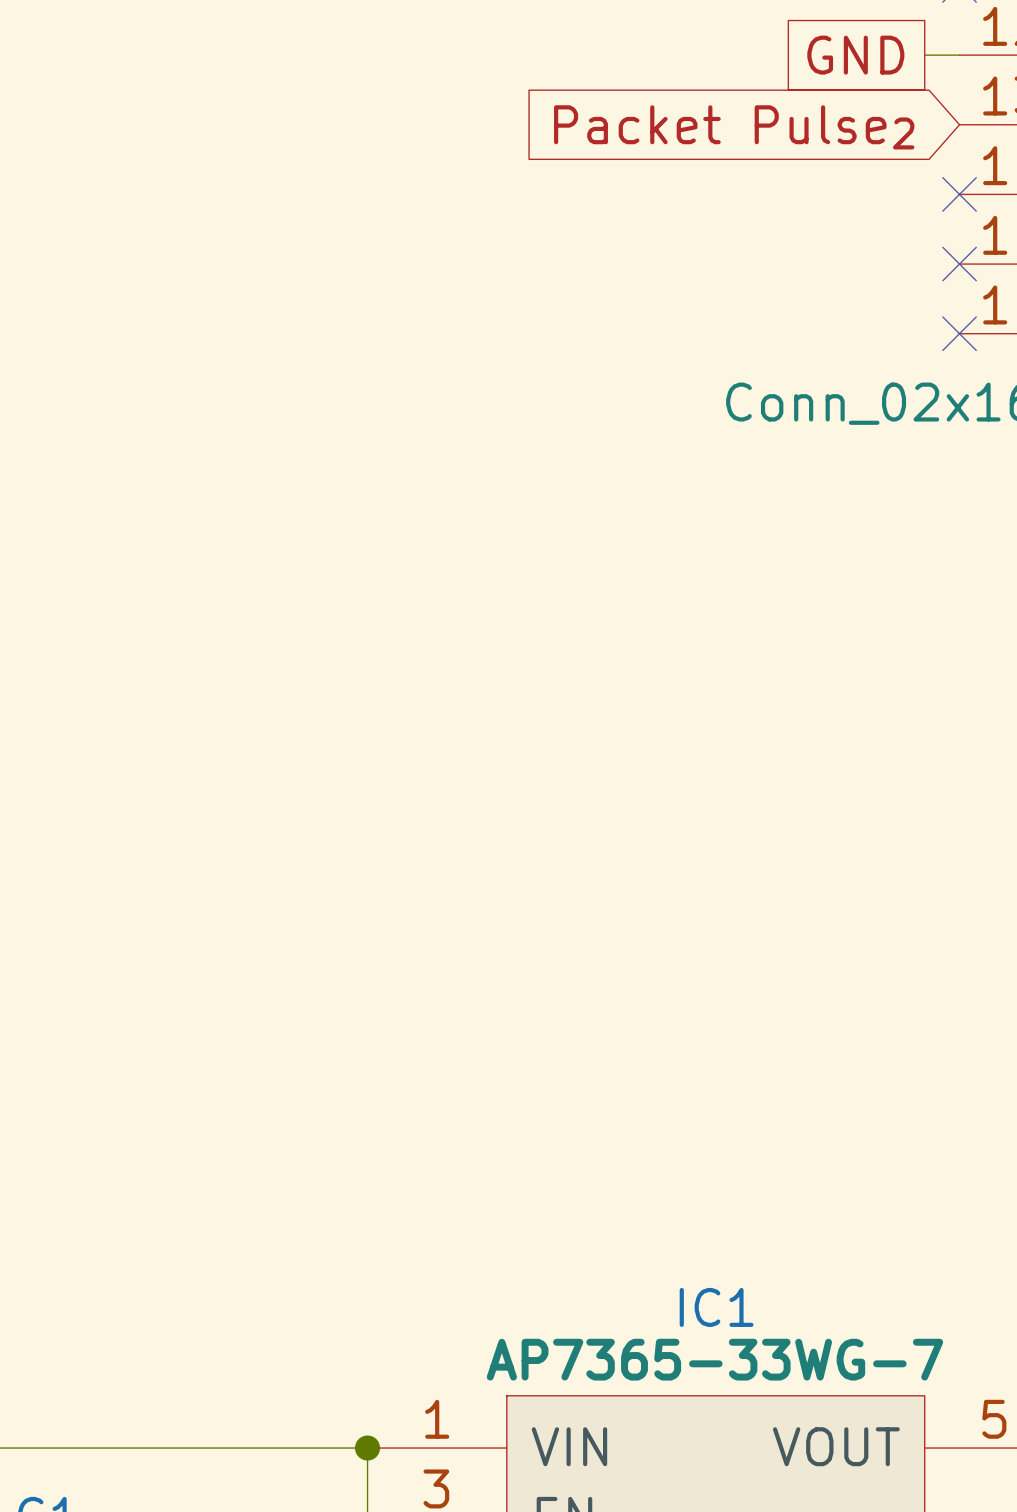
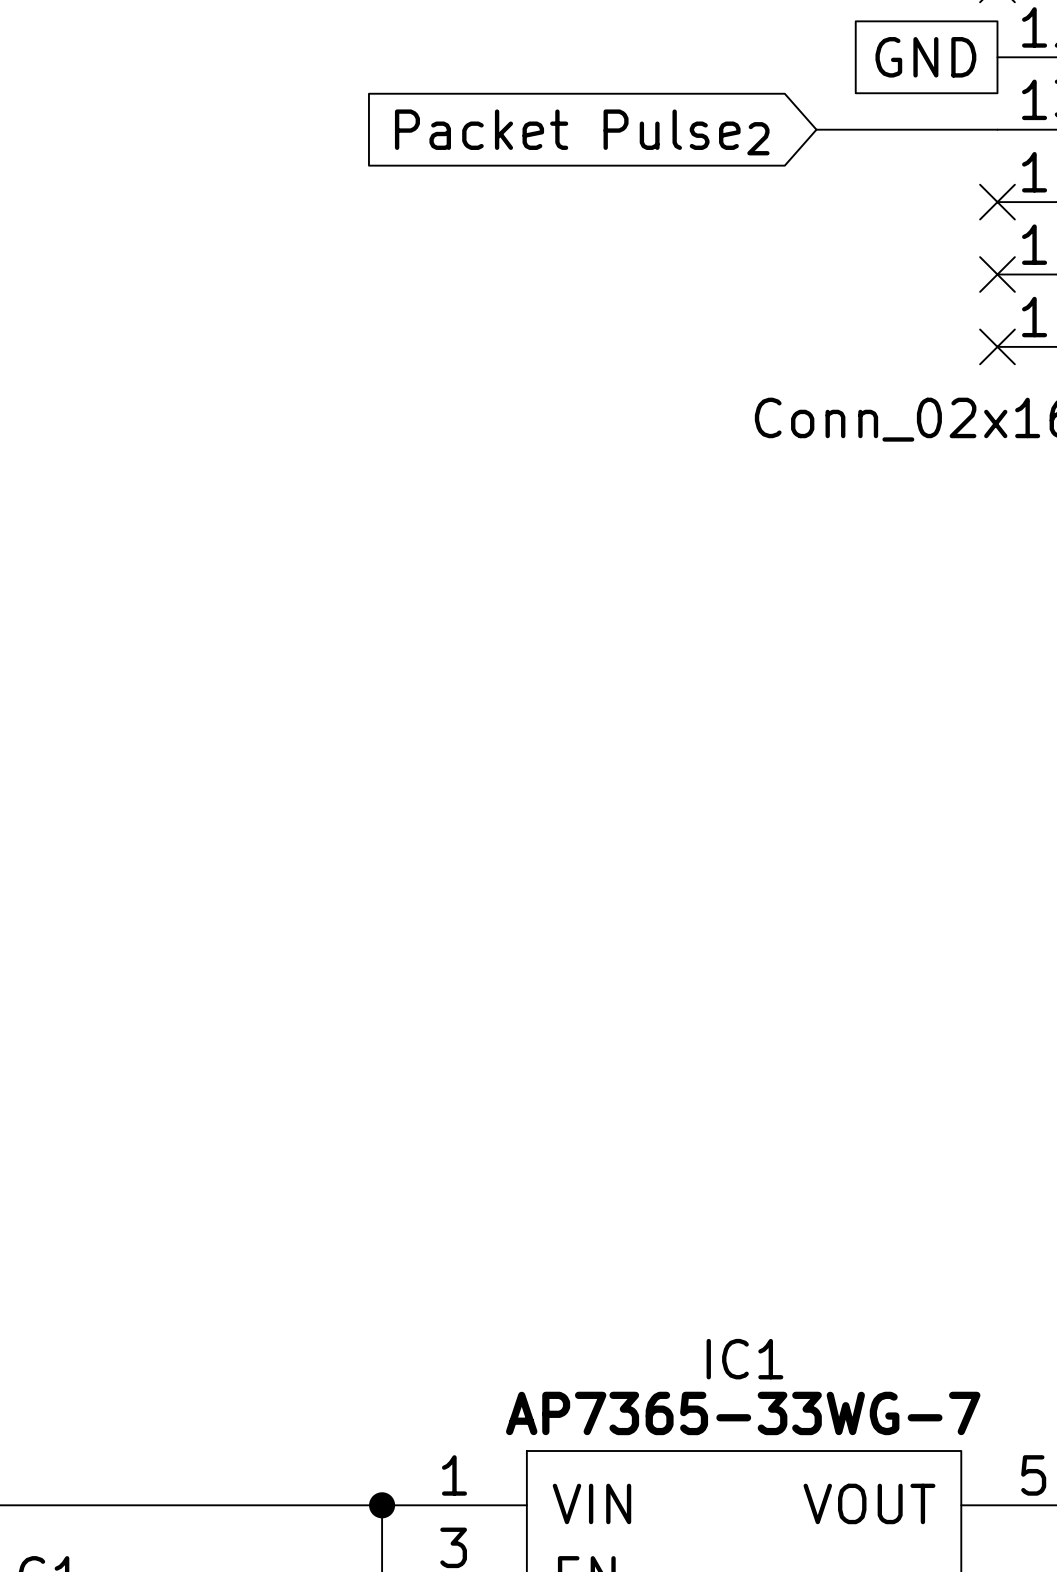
global label position: GND (855, 55) -> GND (925, 57)
wire: (924, 55) (959, 55) -> none
wire: none -> (816, 129) (997, 129)
global label position: Packet Pulse2 (734, 127) -> Packet Pulse2 (582, 132)

